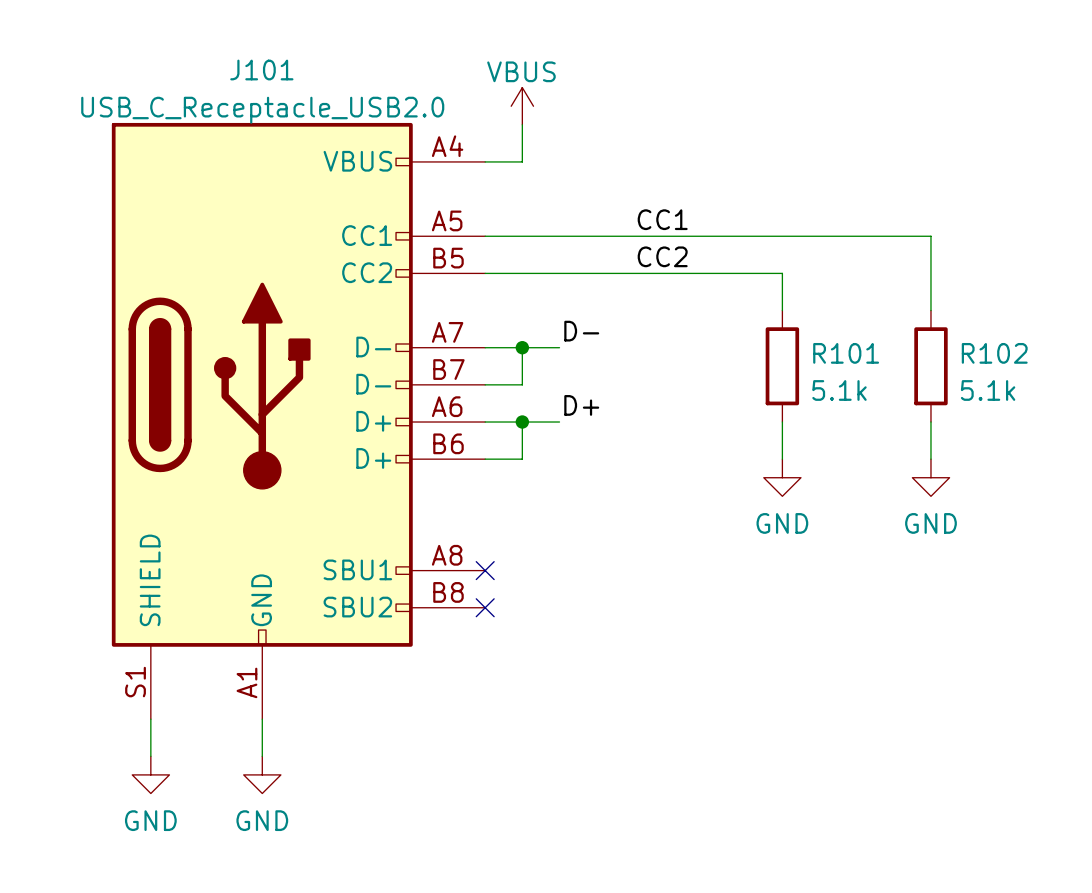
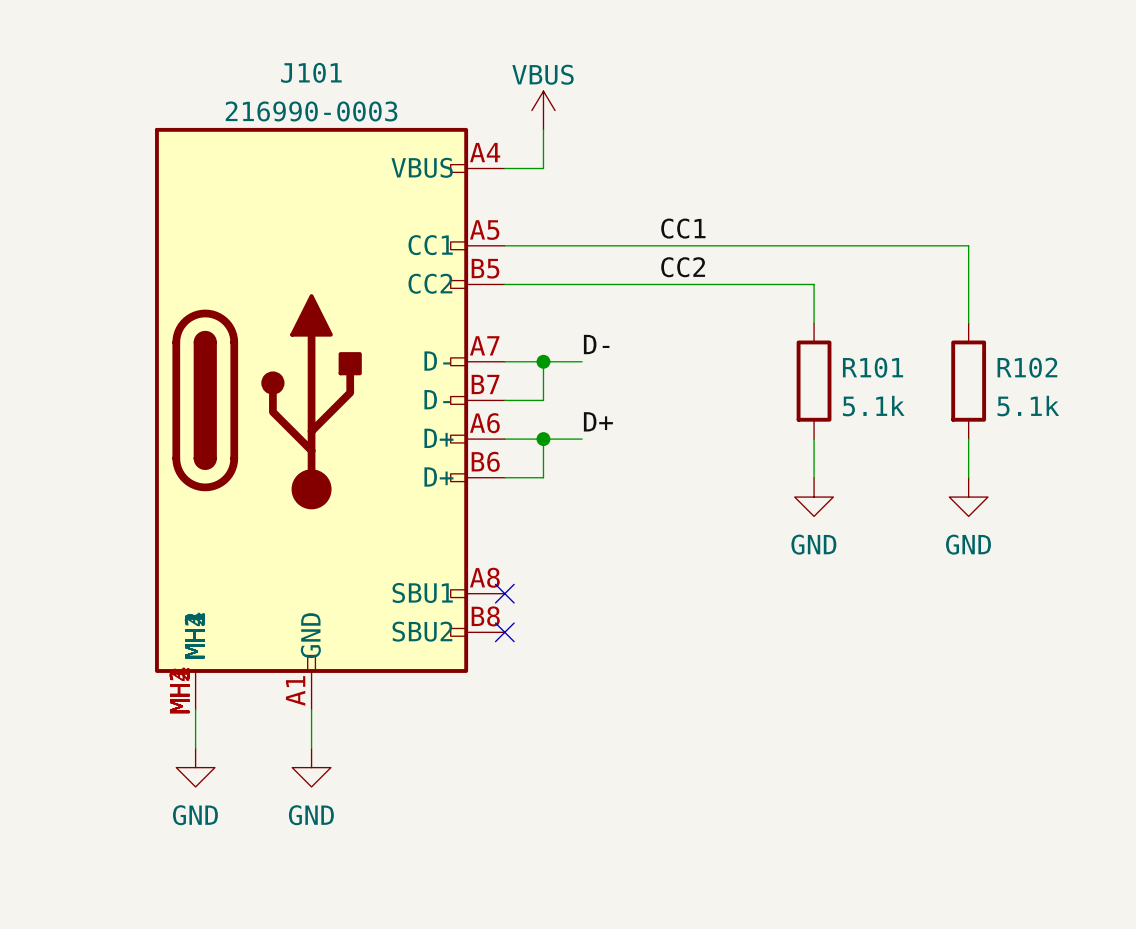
J101 value: USB_C_Receptacle_USB2.0 (262, 110) -> 216990-0003 (311, 111)
J101 symbol: [111, 122, 486, 720] -> [155, 127, 505, 710]
wire: (150, 719) (150, 756) -> (195, 709) (195, 748)
wire: (262, 719) (262, 756) -> (311, 709) (311, 748)
power symbol: none -> GND (195, 767)
power symbol: none -> GND (311, 767)
power symbol: GND (150, 774) -> none
power symbol: GND (262, 774) -> none

